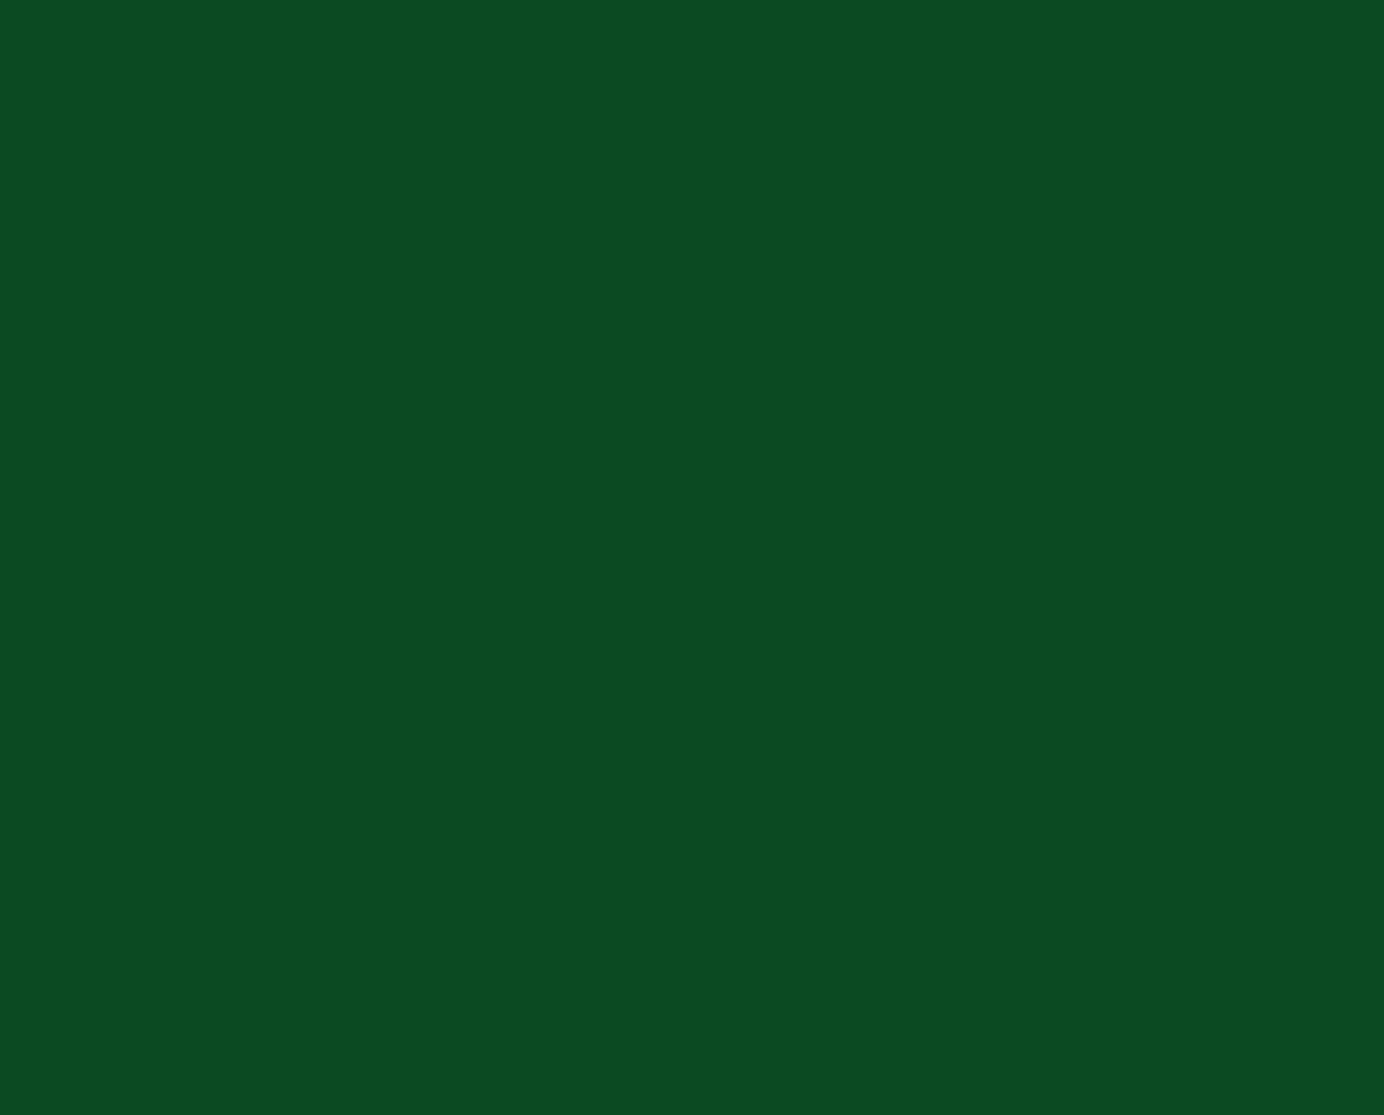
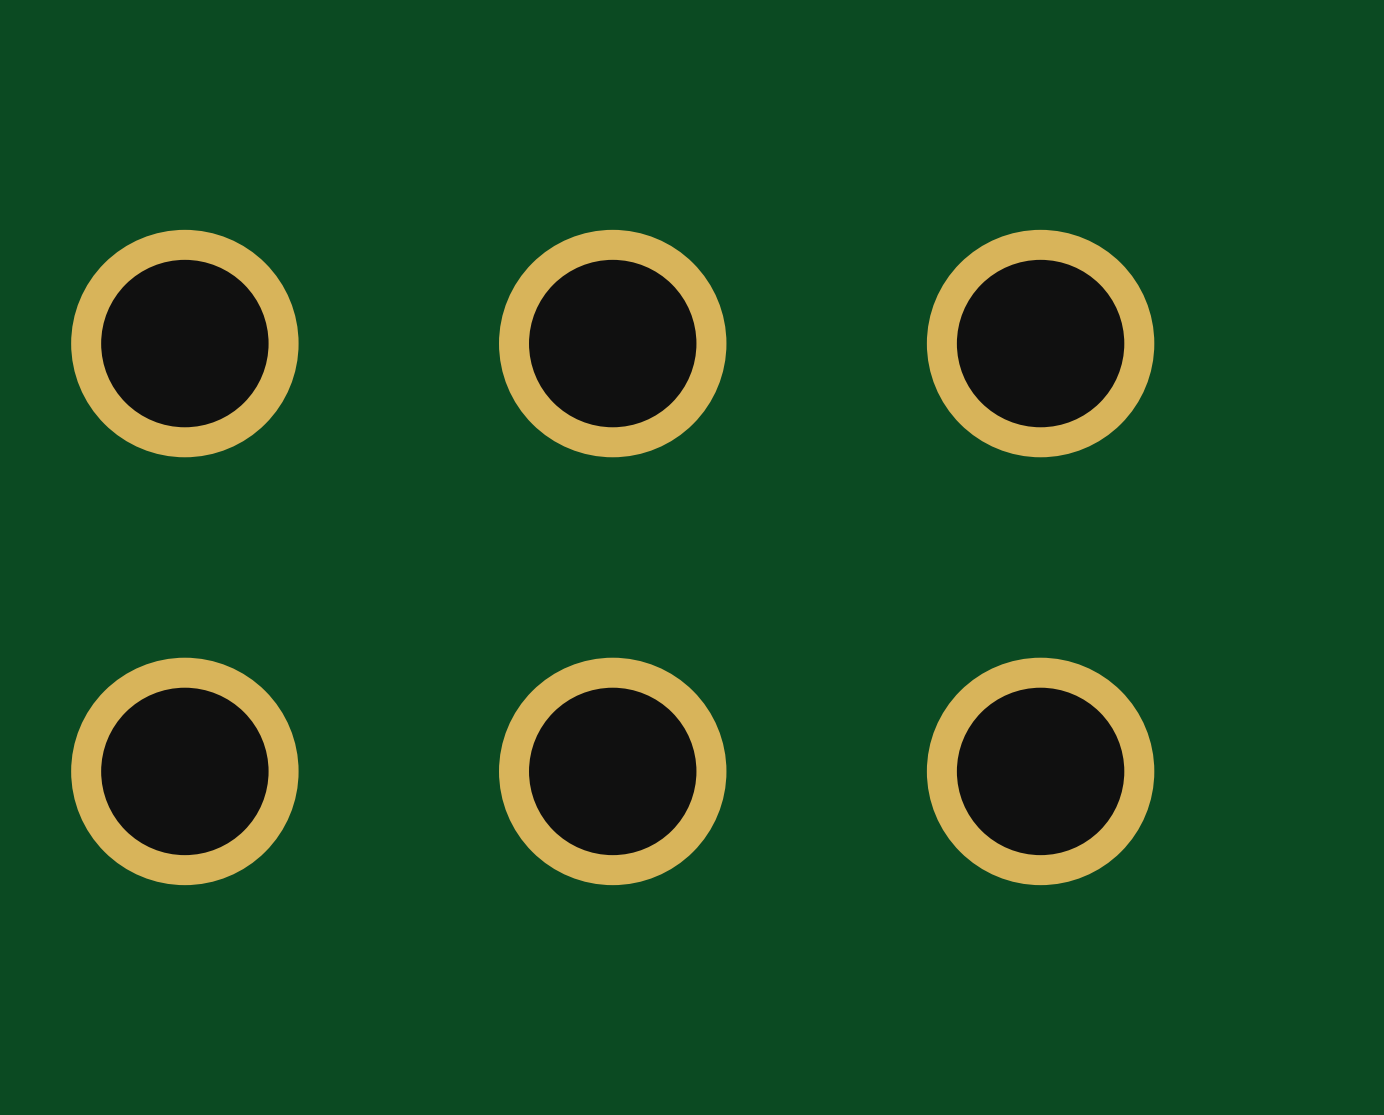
part: none -> (184, 343)
part: none -> (612, 343)
part: none -> (1040, 343)
part: none -> (184, 771)
part: none -> (612, 771)
part: none -> (1040, 771)

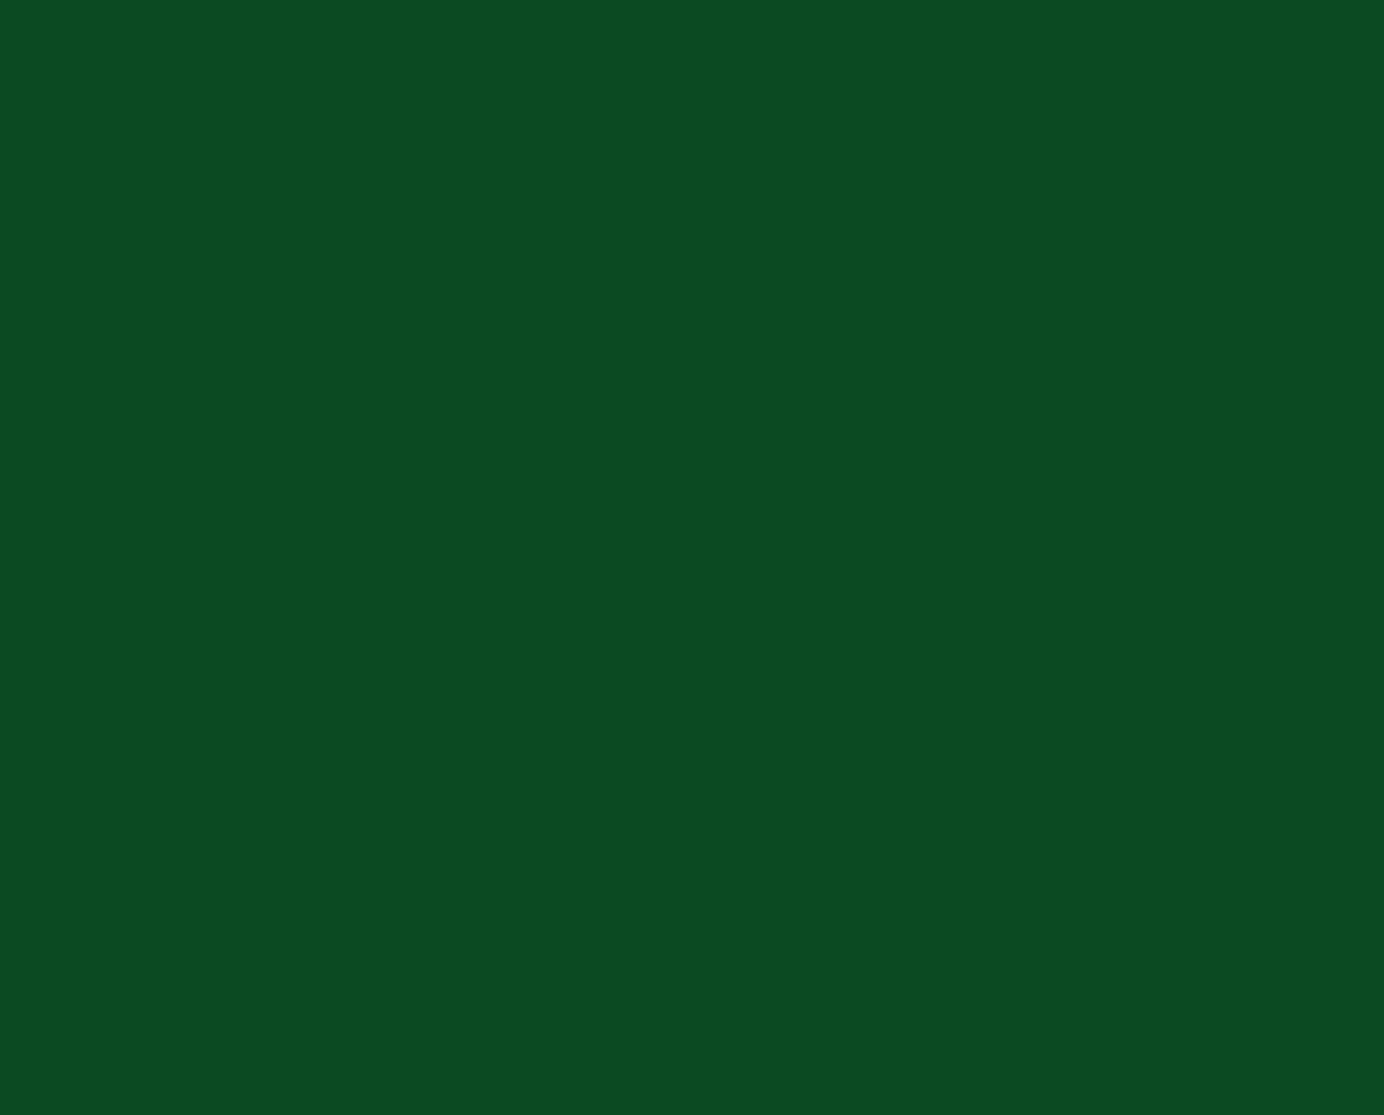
part: (184, 343) -> none
part: (612, 343) -> none
part: (1040, 343) -> none
part: (184, 771) -> none
part: (612, 771) -> none
part: (1040, 771) -> none

